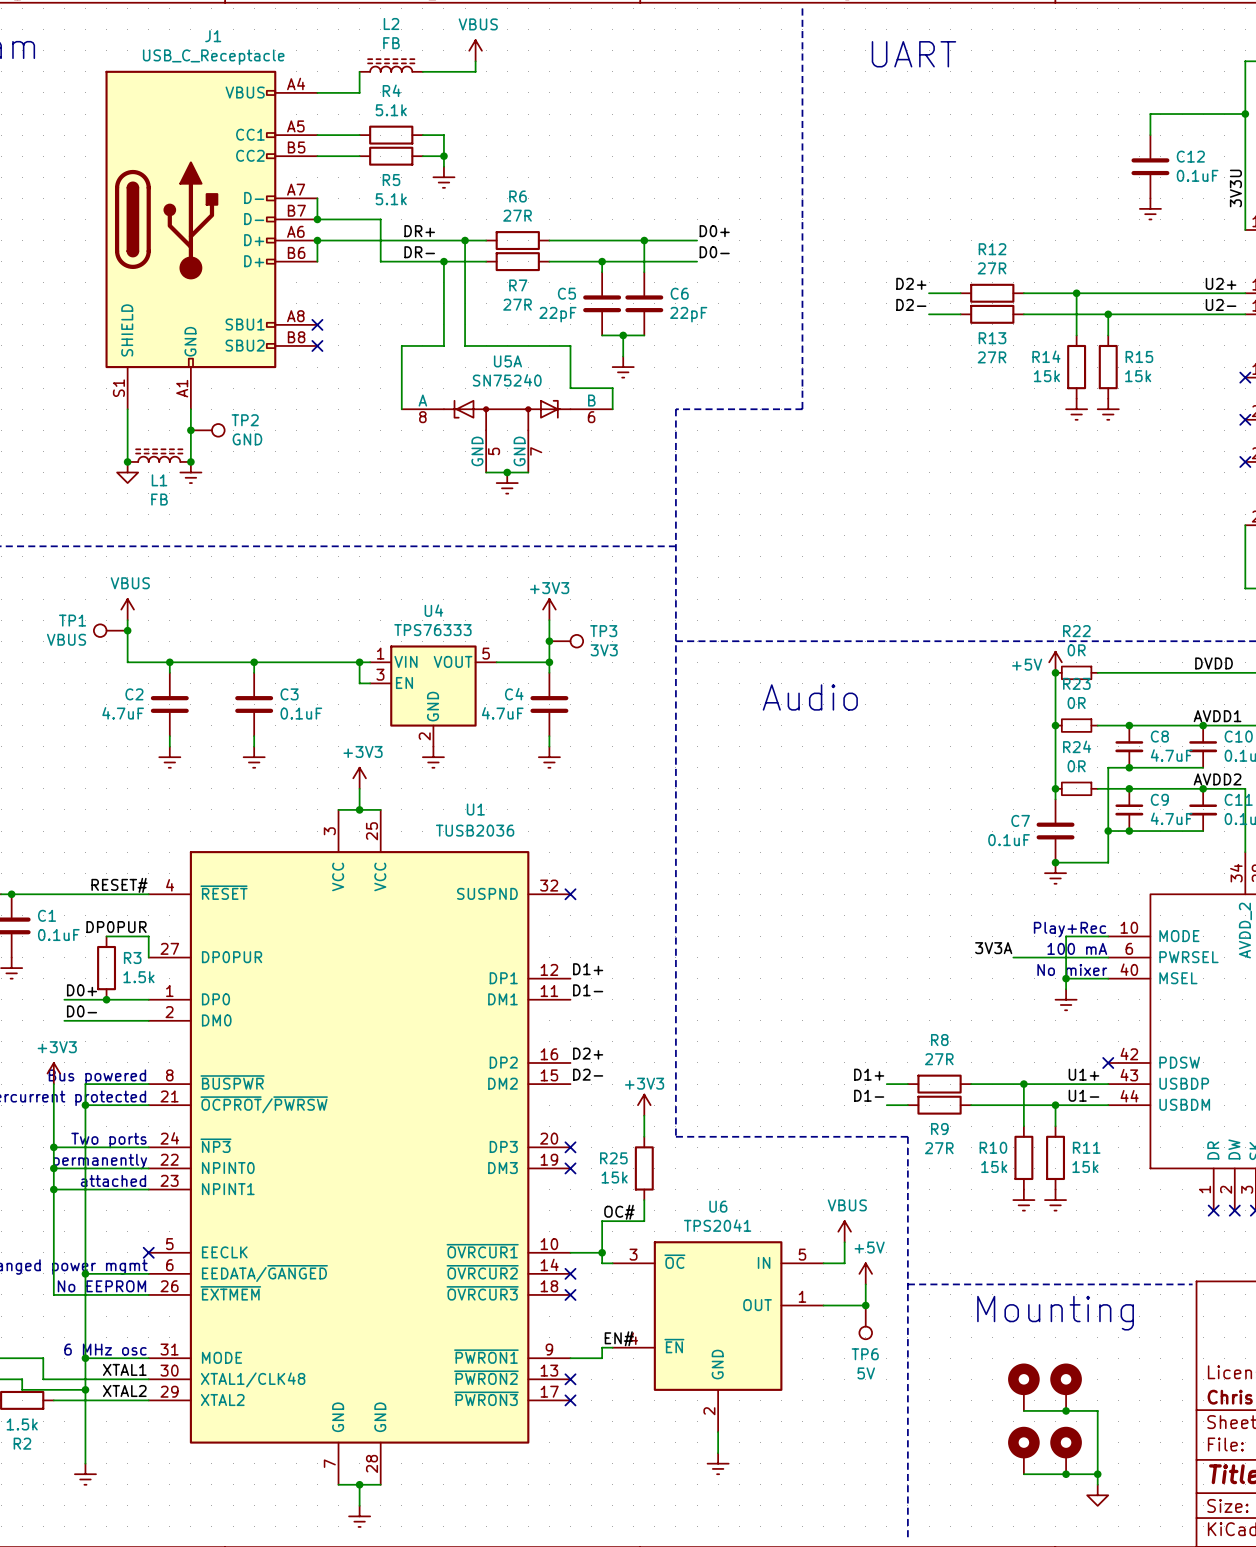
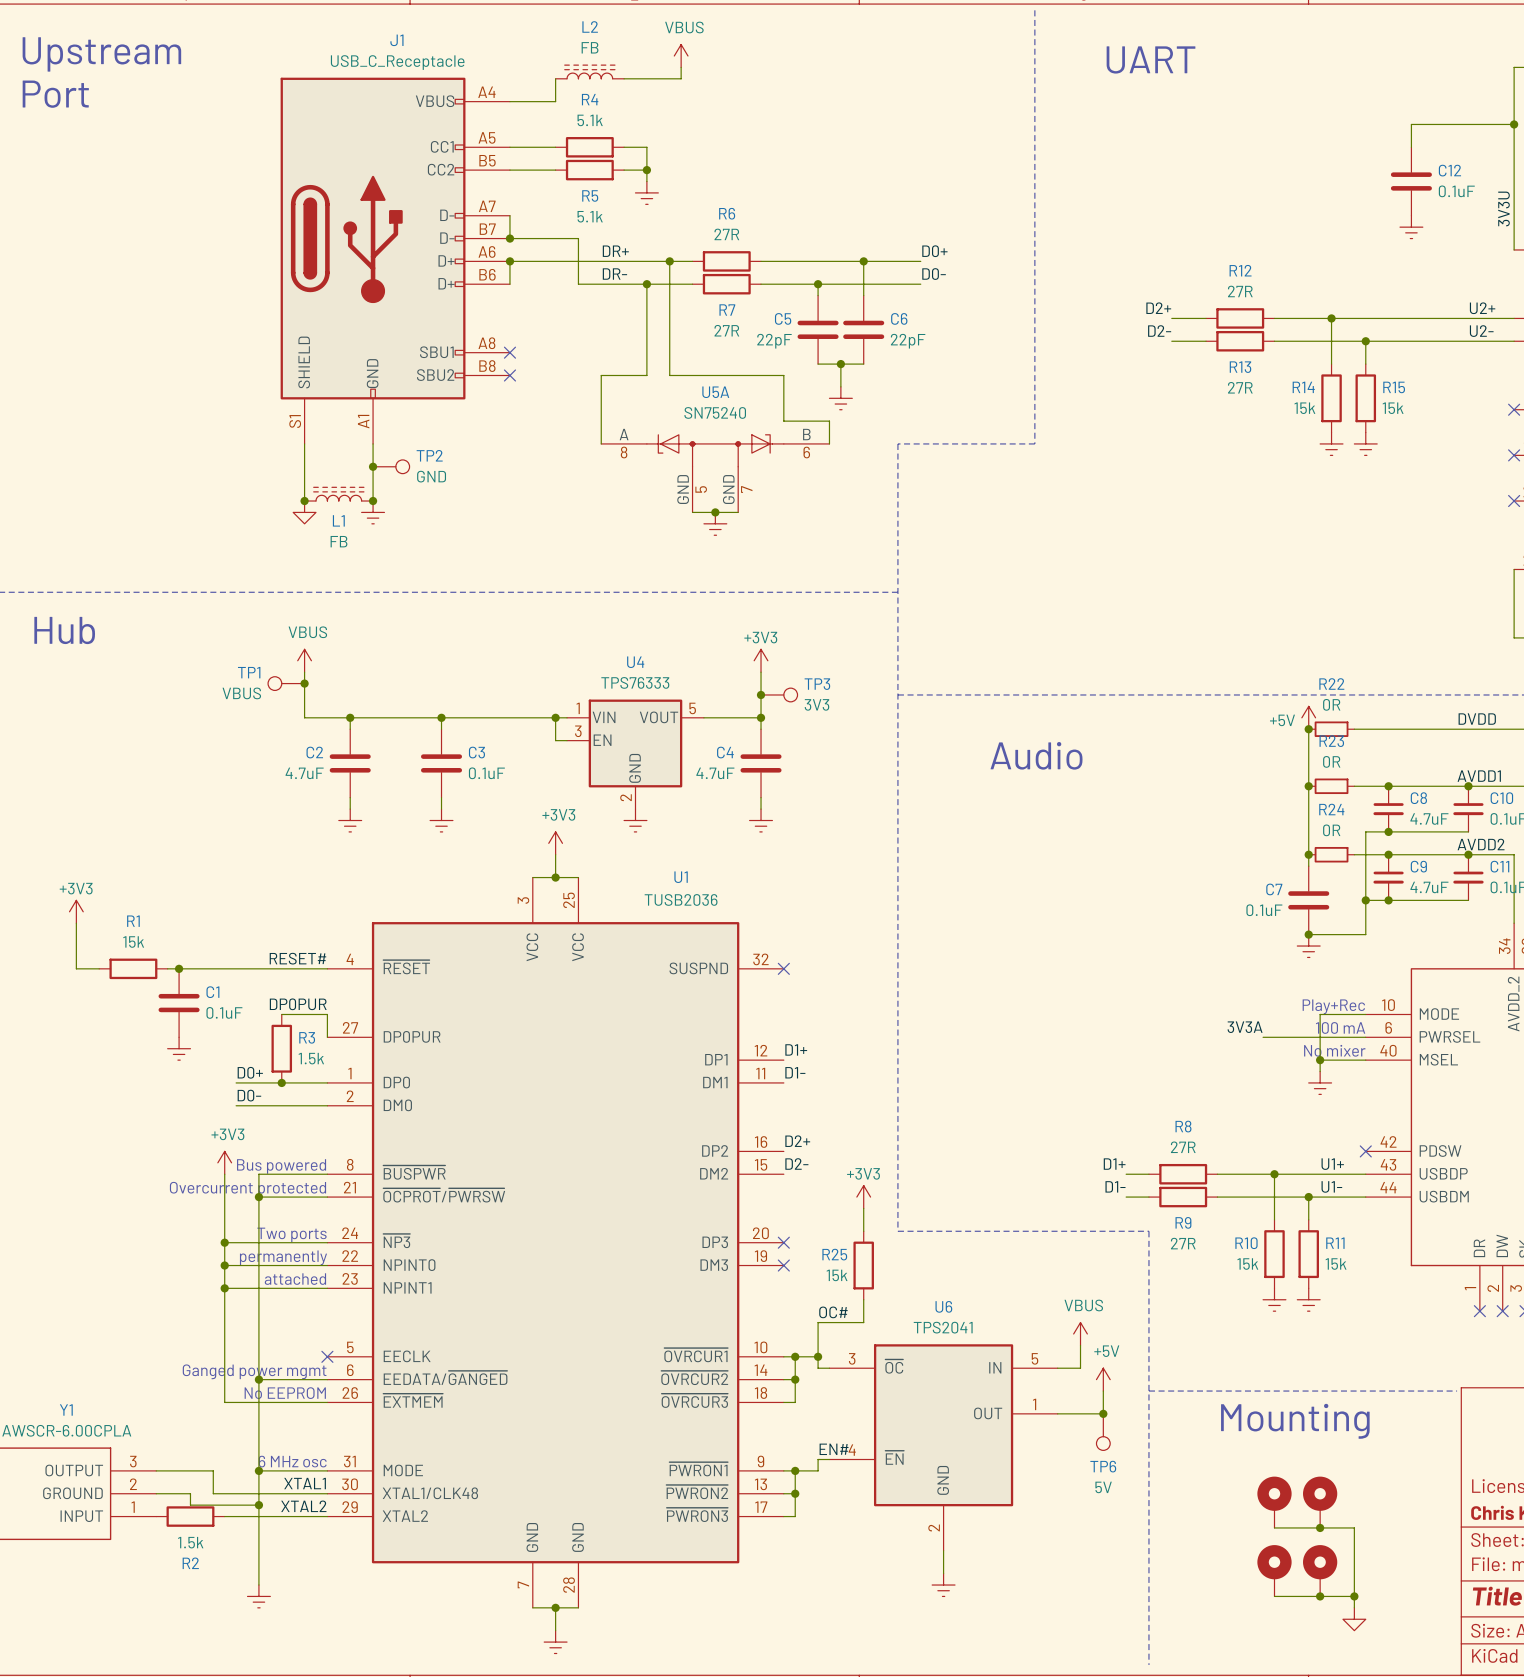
wire: none -> (795, 1356) (795, 1402) (783, 1402)
junction: none -> (795, 1356)
wire: none -> (783, 1379) (795, 1379)
no-connect mark: (570, 1273) -> none
junction: none -> (795, 1379)
no-connect mark: (570, 1294) -> none
wire: none -> (795, 1470) (795, 1516) (783, 1516)
junction: none -> (795, 1470)
wire: none -> (783, 1493) (795, 1493)
no-connect mark: (570, 1379) -> none
junction: none -> (795, 1493)
no-connect mark: (570, 1400) -> none

